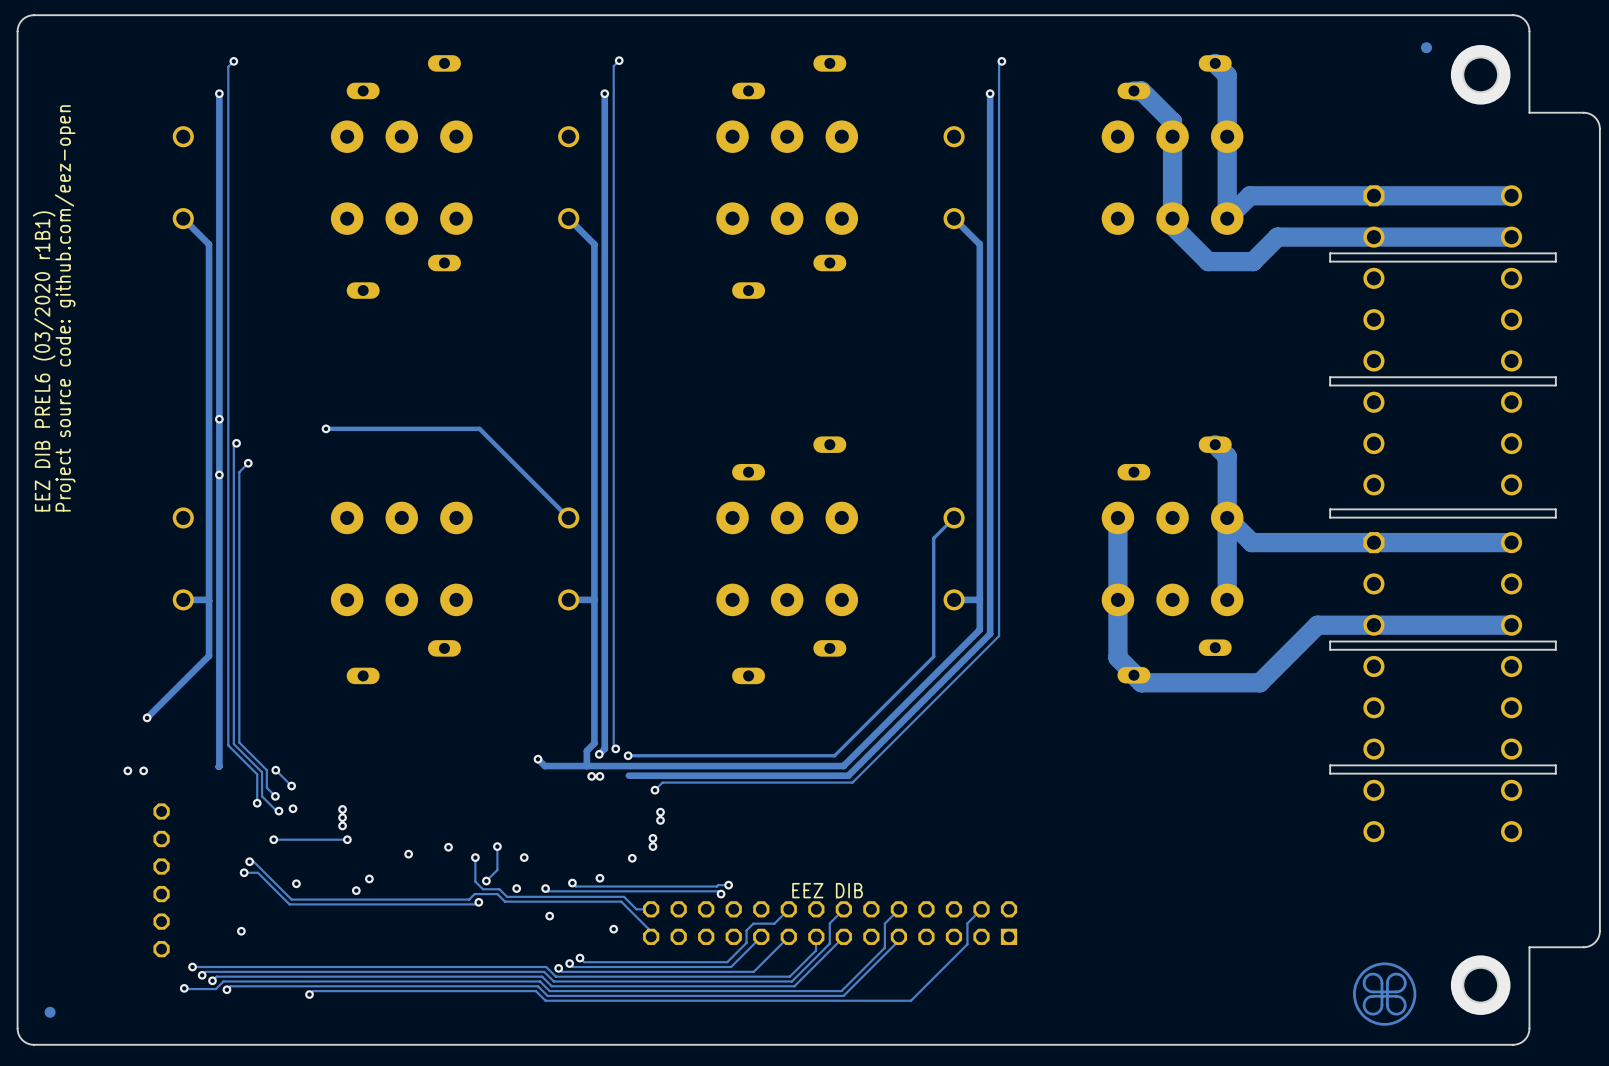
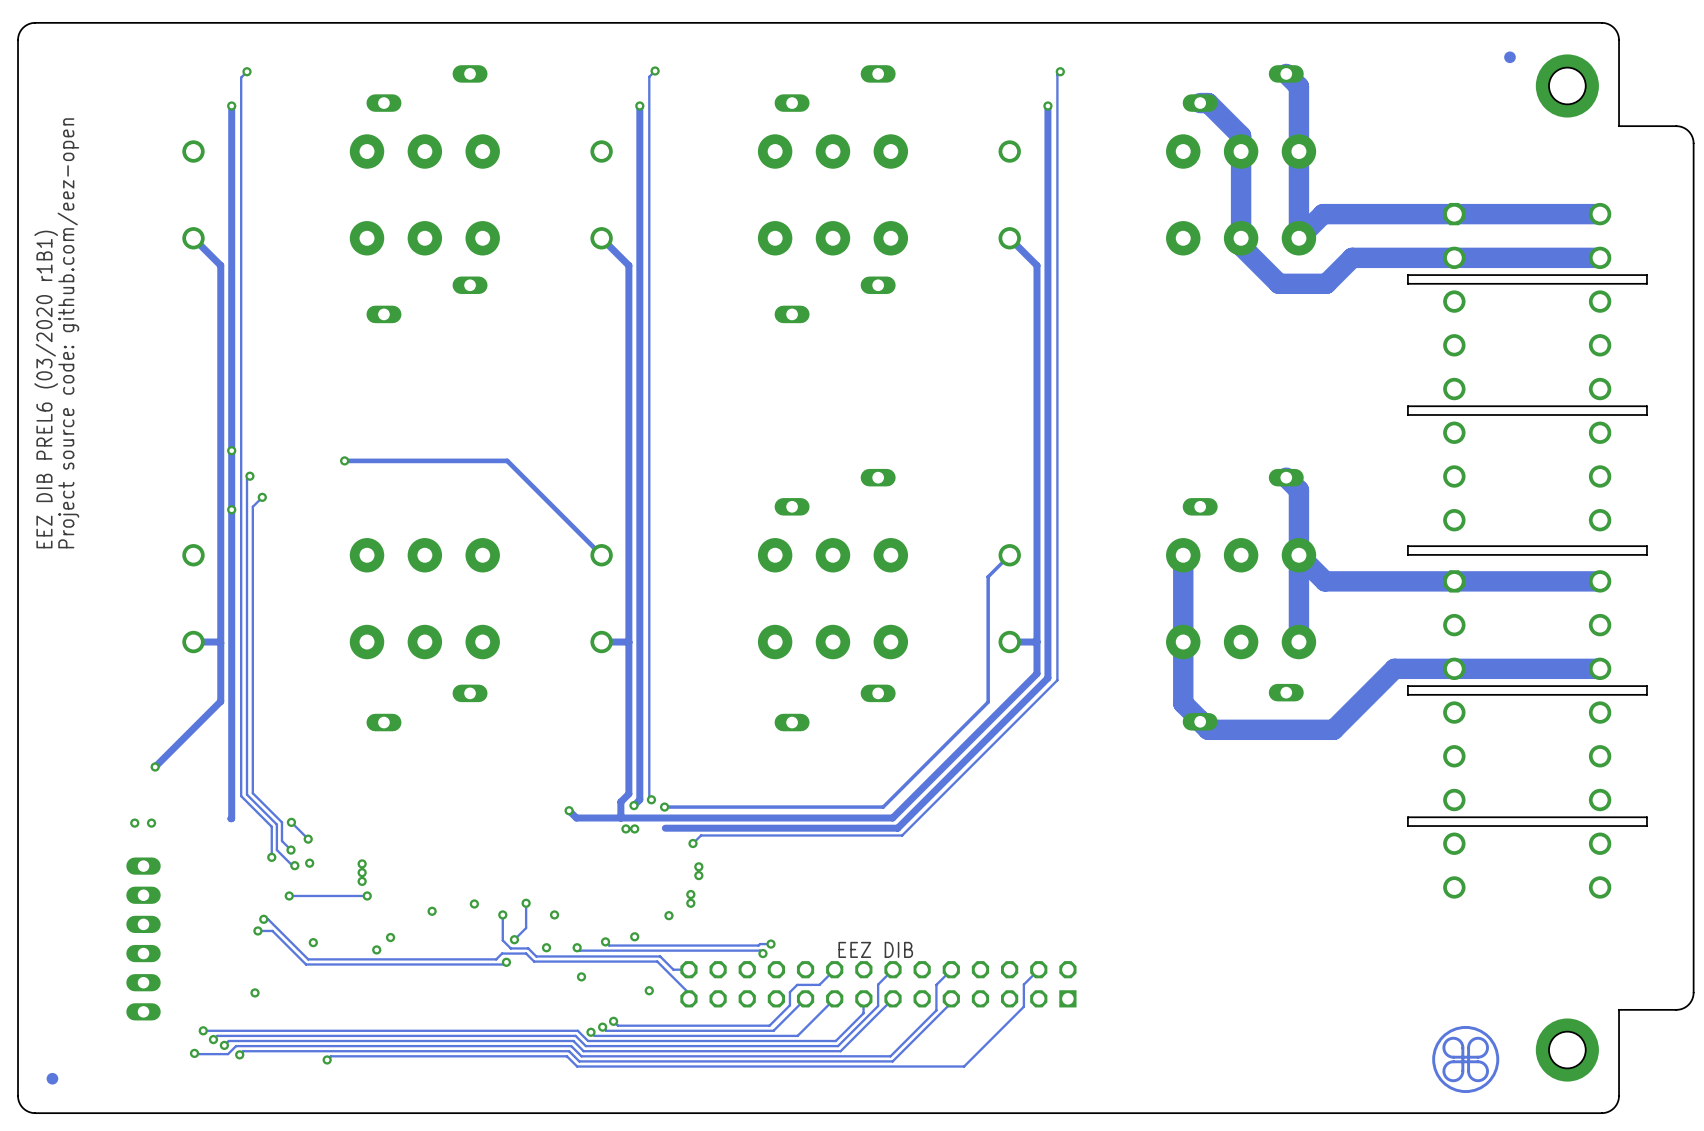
part: none -> (143, 938)
part: (161, 880) -> none

